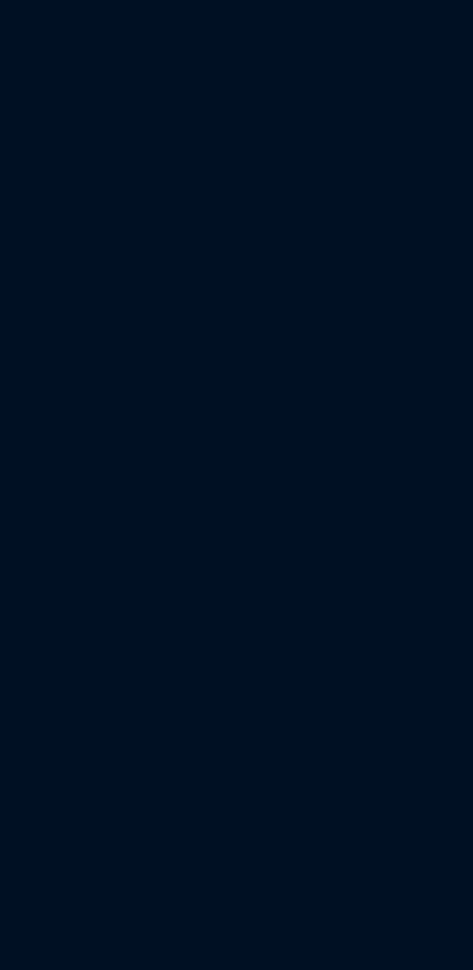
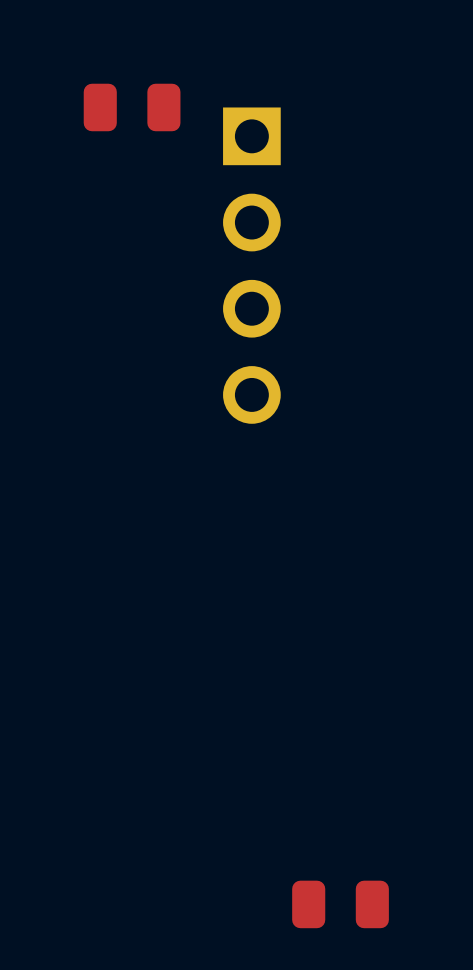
part: none -> (132, 107)
part: none -> (251, 265)
part: none -> (340, 904)

